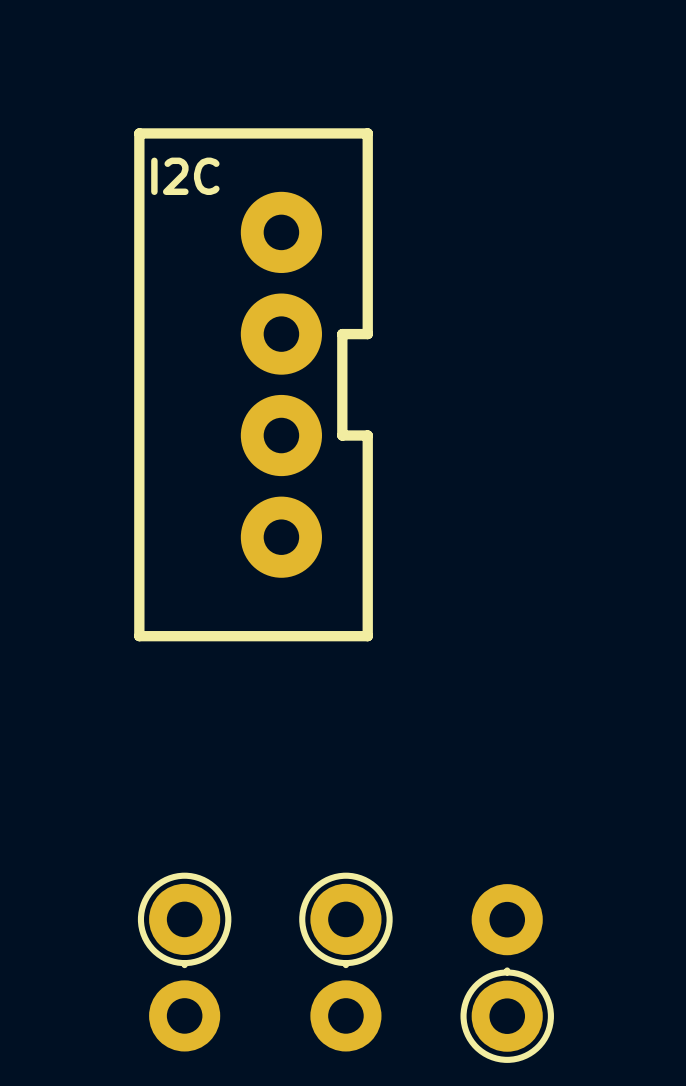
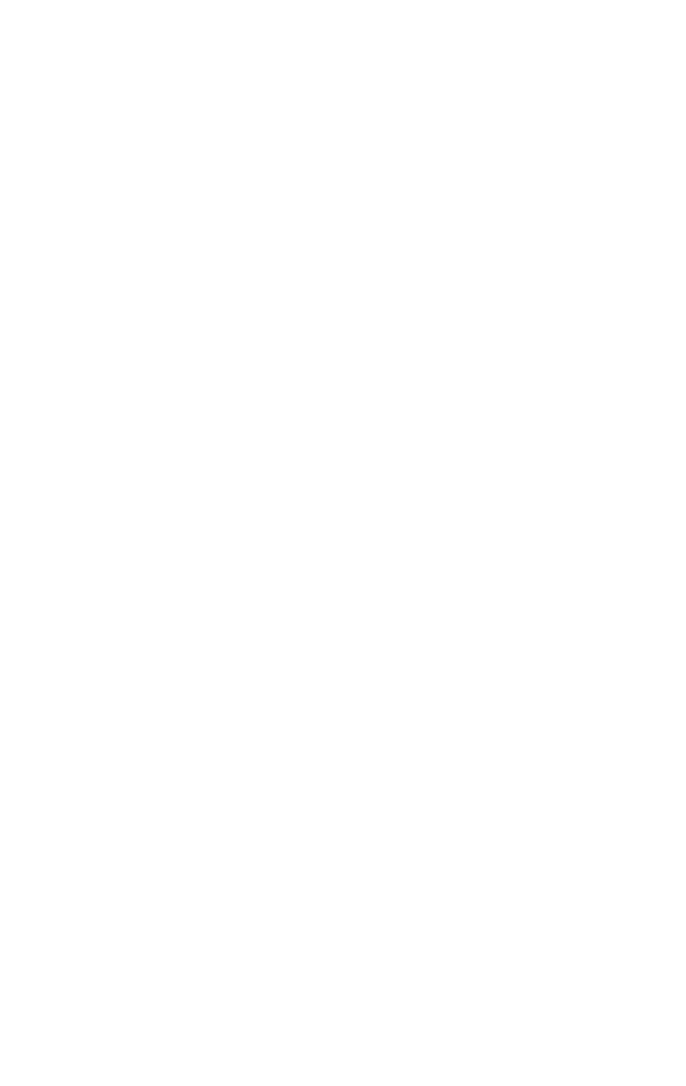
part: I2C (253, 384) -> none
part: (184, 962) -> none
part: (345, 962) -> none
part: (507, 973) -> none

